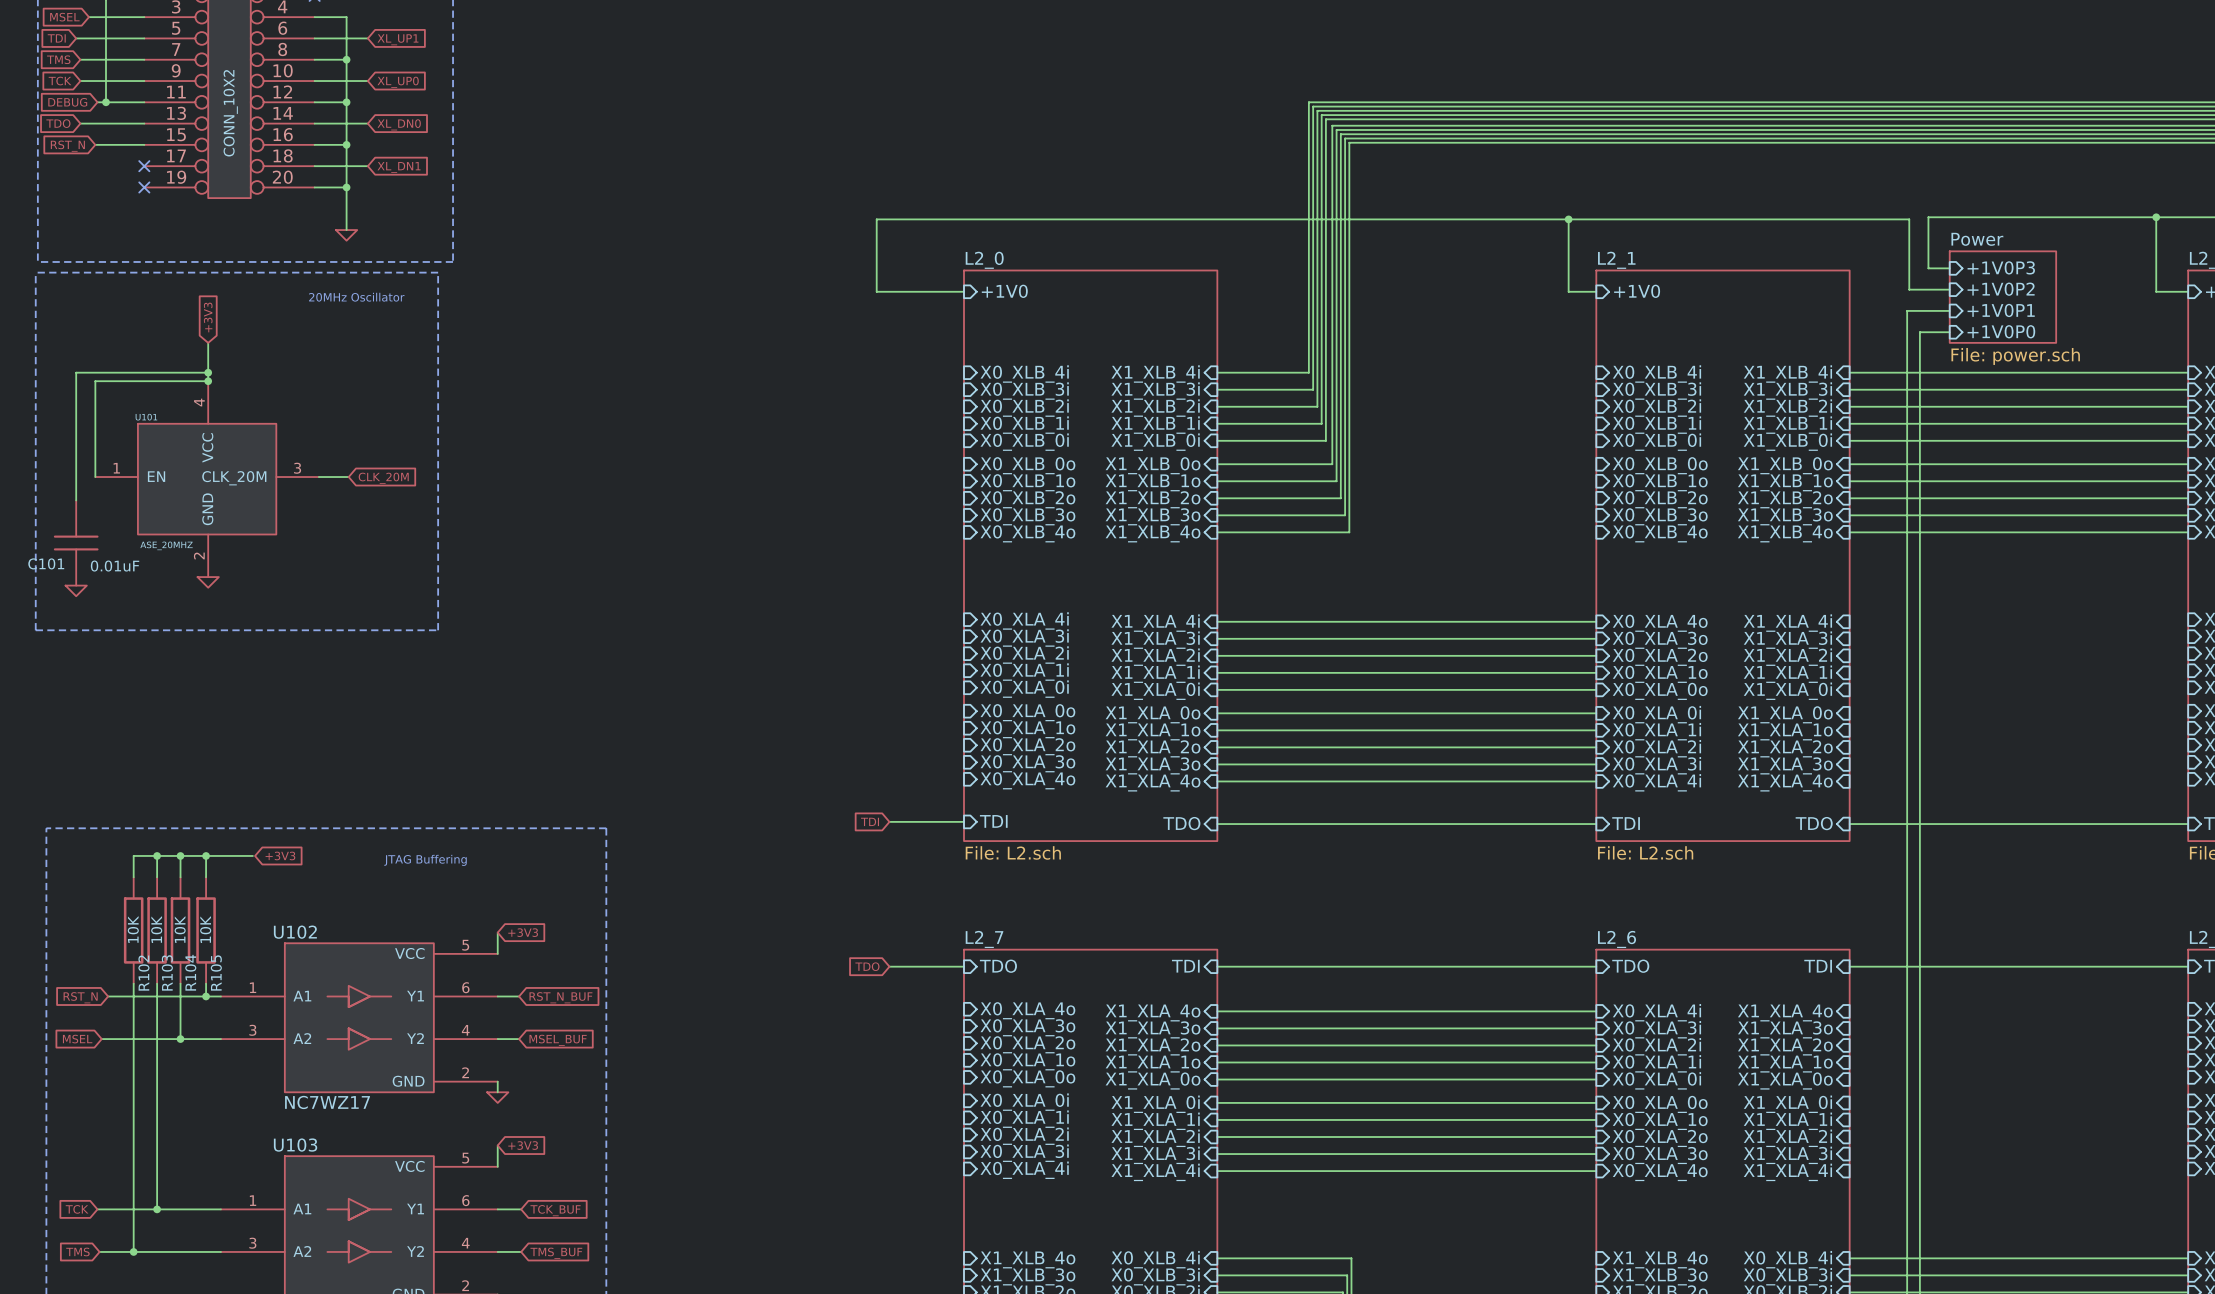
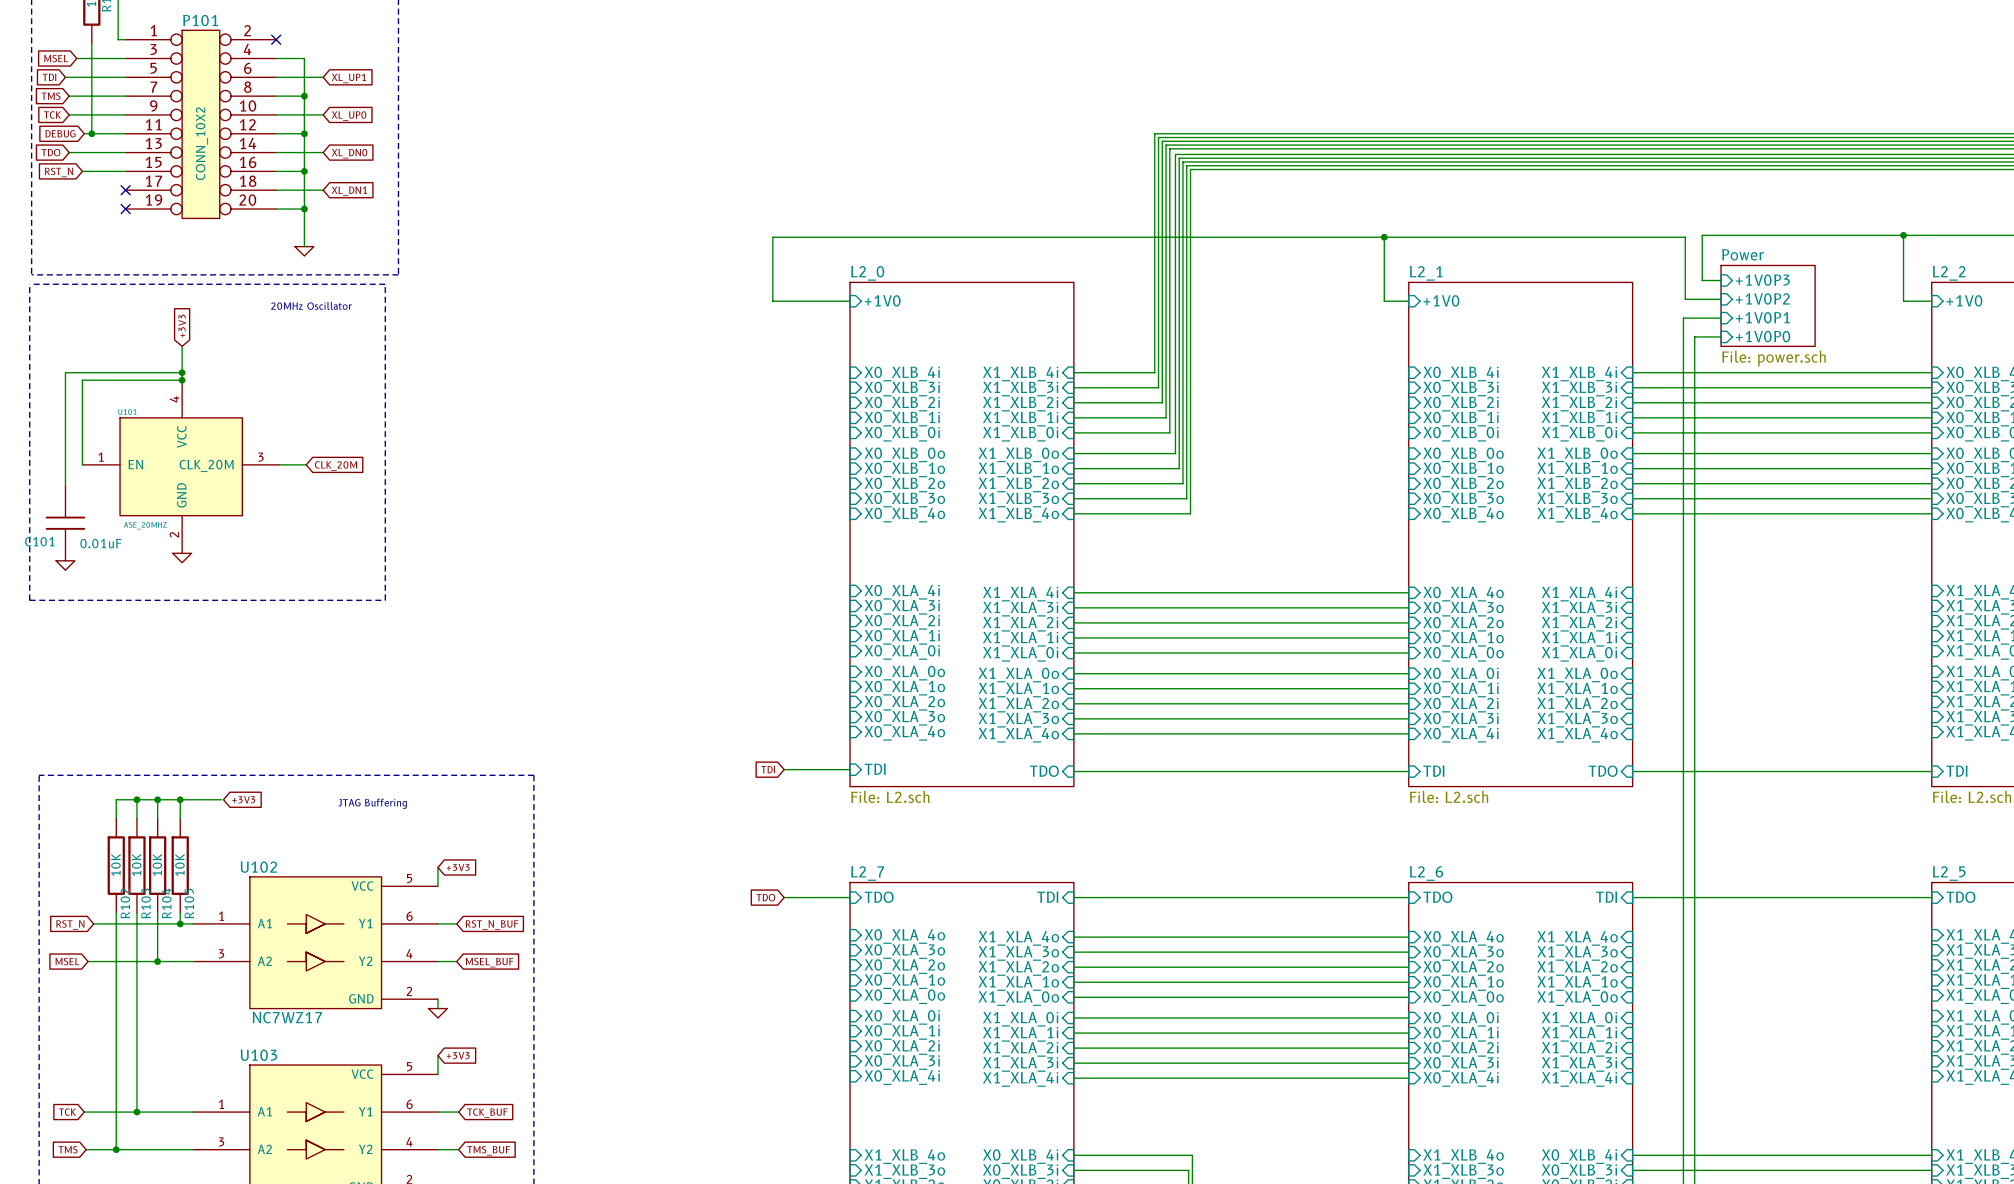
sheet pin: X0_XLA_4i (1656, 1012) -> X0_XLA_4o (1463, 938)
sheet pin: X0_XLA_3i (1656, 1029) -> X0_XLA_3o (1463, 953)
sheet pin: X0_XLA_2i (1656, 1046) -> X0_XLA_2o (1463, 968)
sheet pin: X0_XLA_1i (1656, 1063) -> X0_XLA_1o (1463, 983)
sheet pin: X0_XLA_0i (1656, 1080) -> X0_XLA_0o (1463, 998)
sheet pin: X0_XLA_0o (1660, 1104) -> X0_XLA_0i (1460, 1019)
sheet pin: X0_XLA_1o (1660, 1121) -> X0_XLA_1i (1460, 1034)
sheet pin: X0_XLA_2o (1660, 1138) -> X0_XLA_2i (1460, 1049)
sheet pin: X0_XLA_3o (1660, 1155) -> X0_XLA_3i (1460, 1064)
sheet pin: X0_XLA_4o (1660, 1172) -> X0_XLA_4i (1460, 1079)

